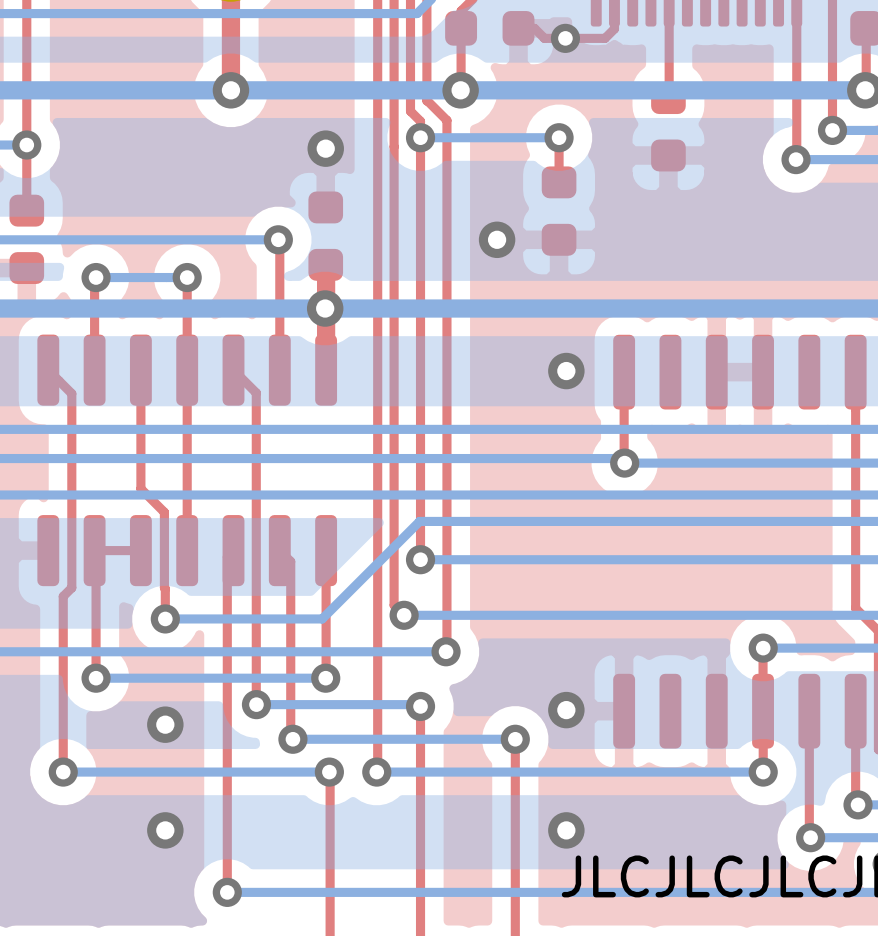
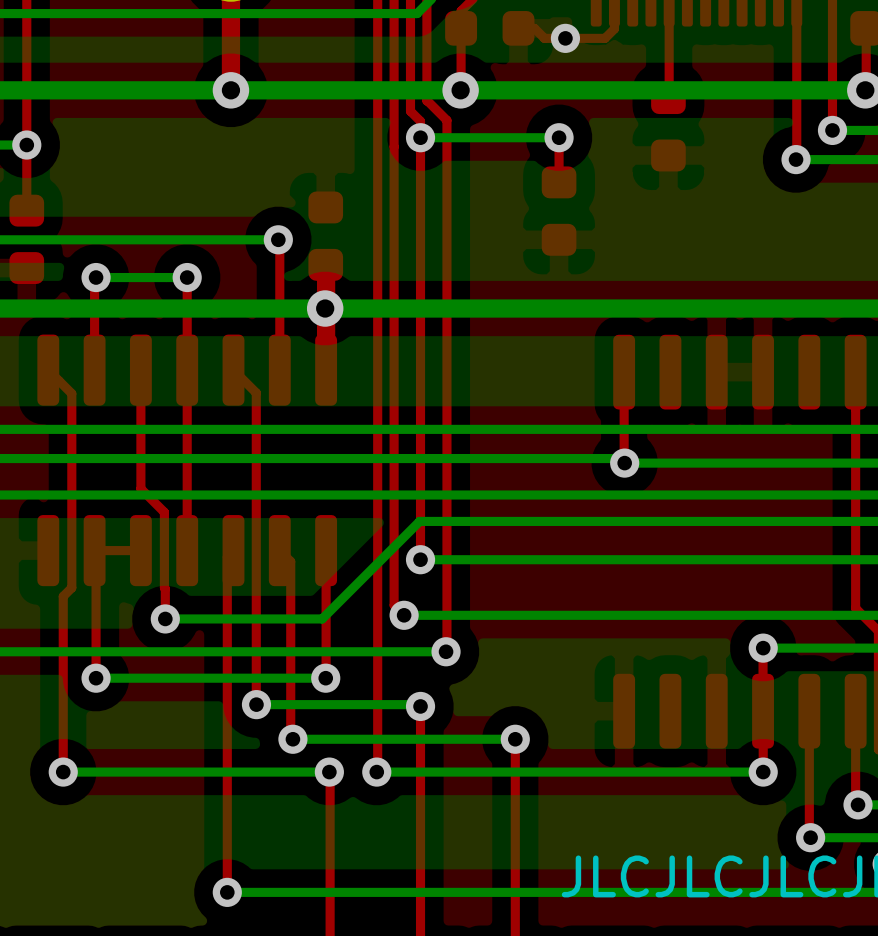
via: (325, 148) -> none
via: (497, 239) -> none
via: (566, 371) -> none
via: (566, 710) -> none
via: (165, 724) -> none
via: (165, 830) -> none
via: (566, 830) -> none

